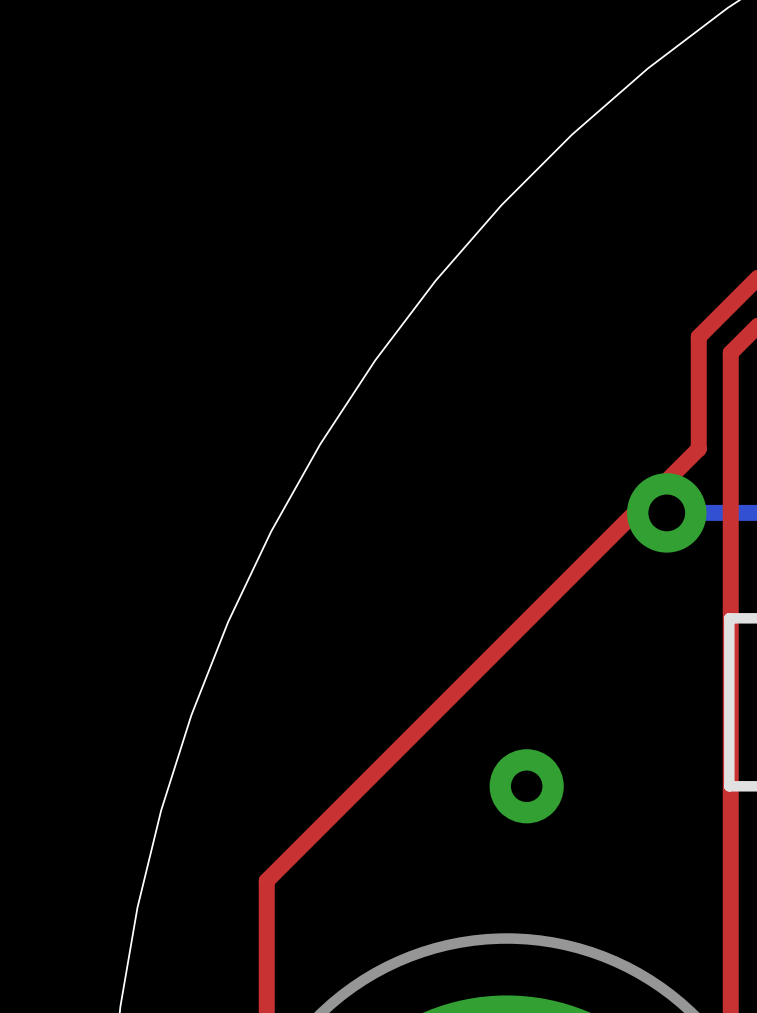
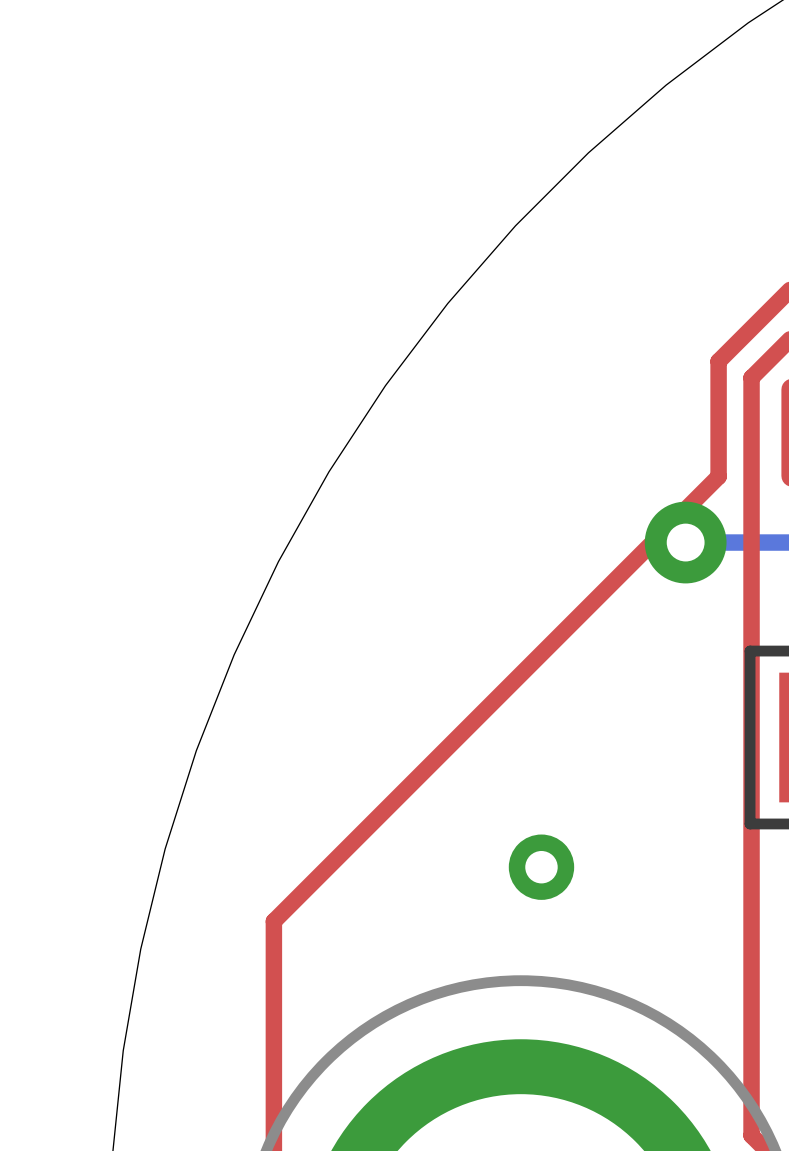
via position: (526, 786) -> (541, 867)

